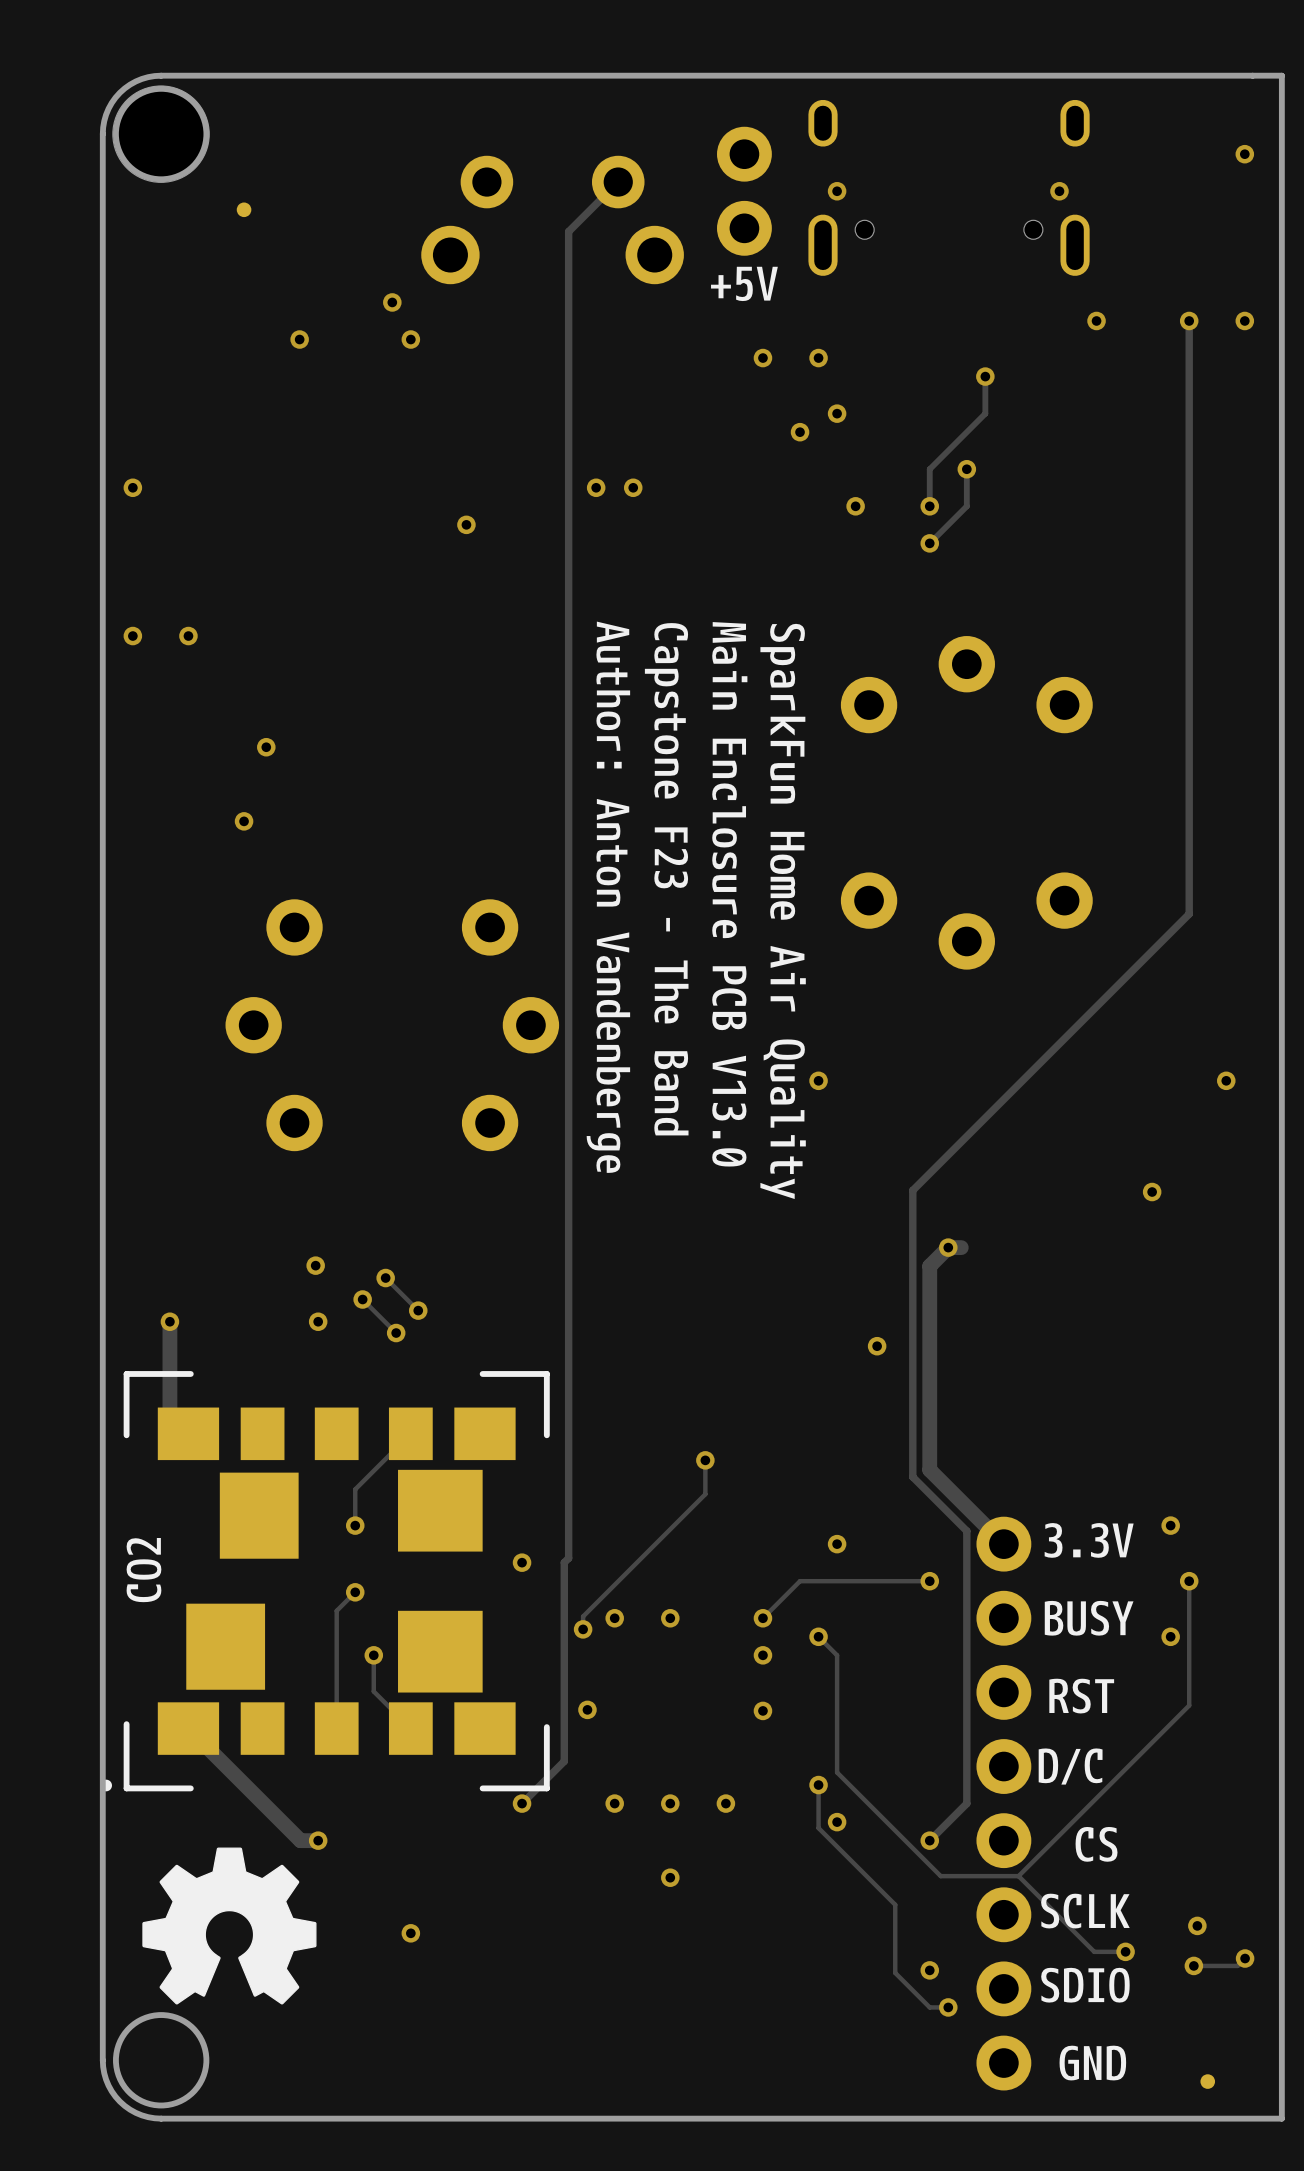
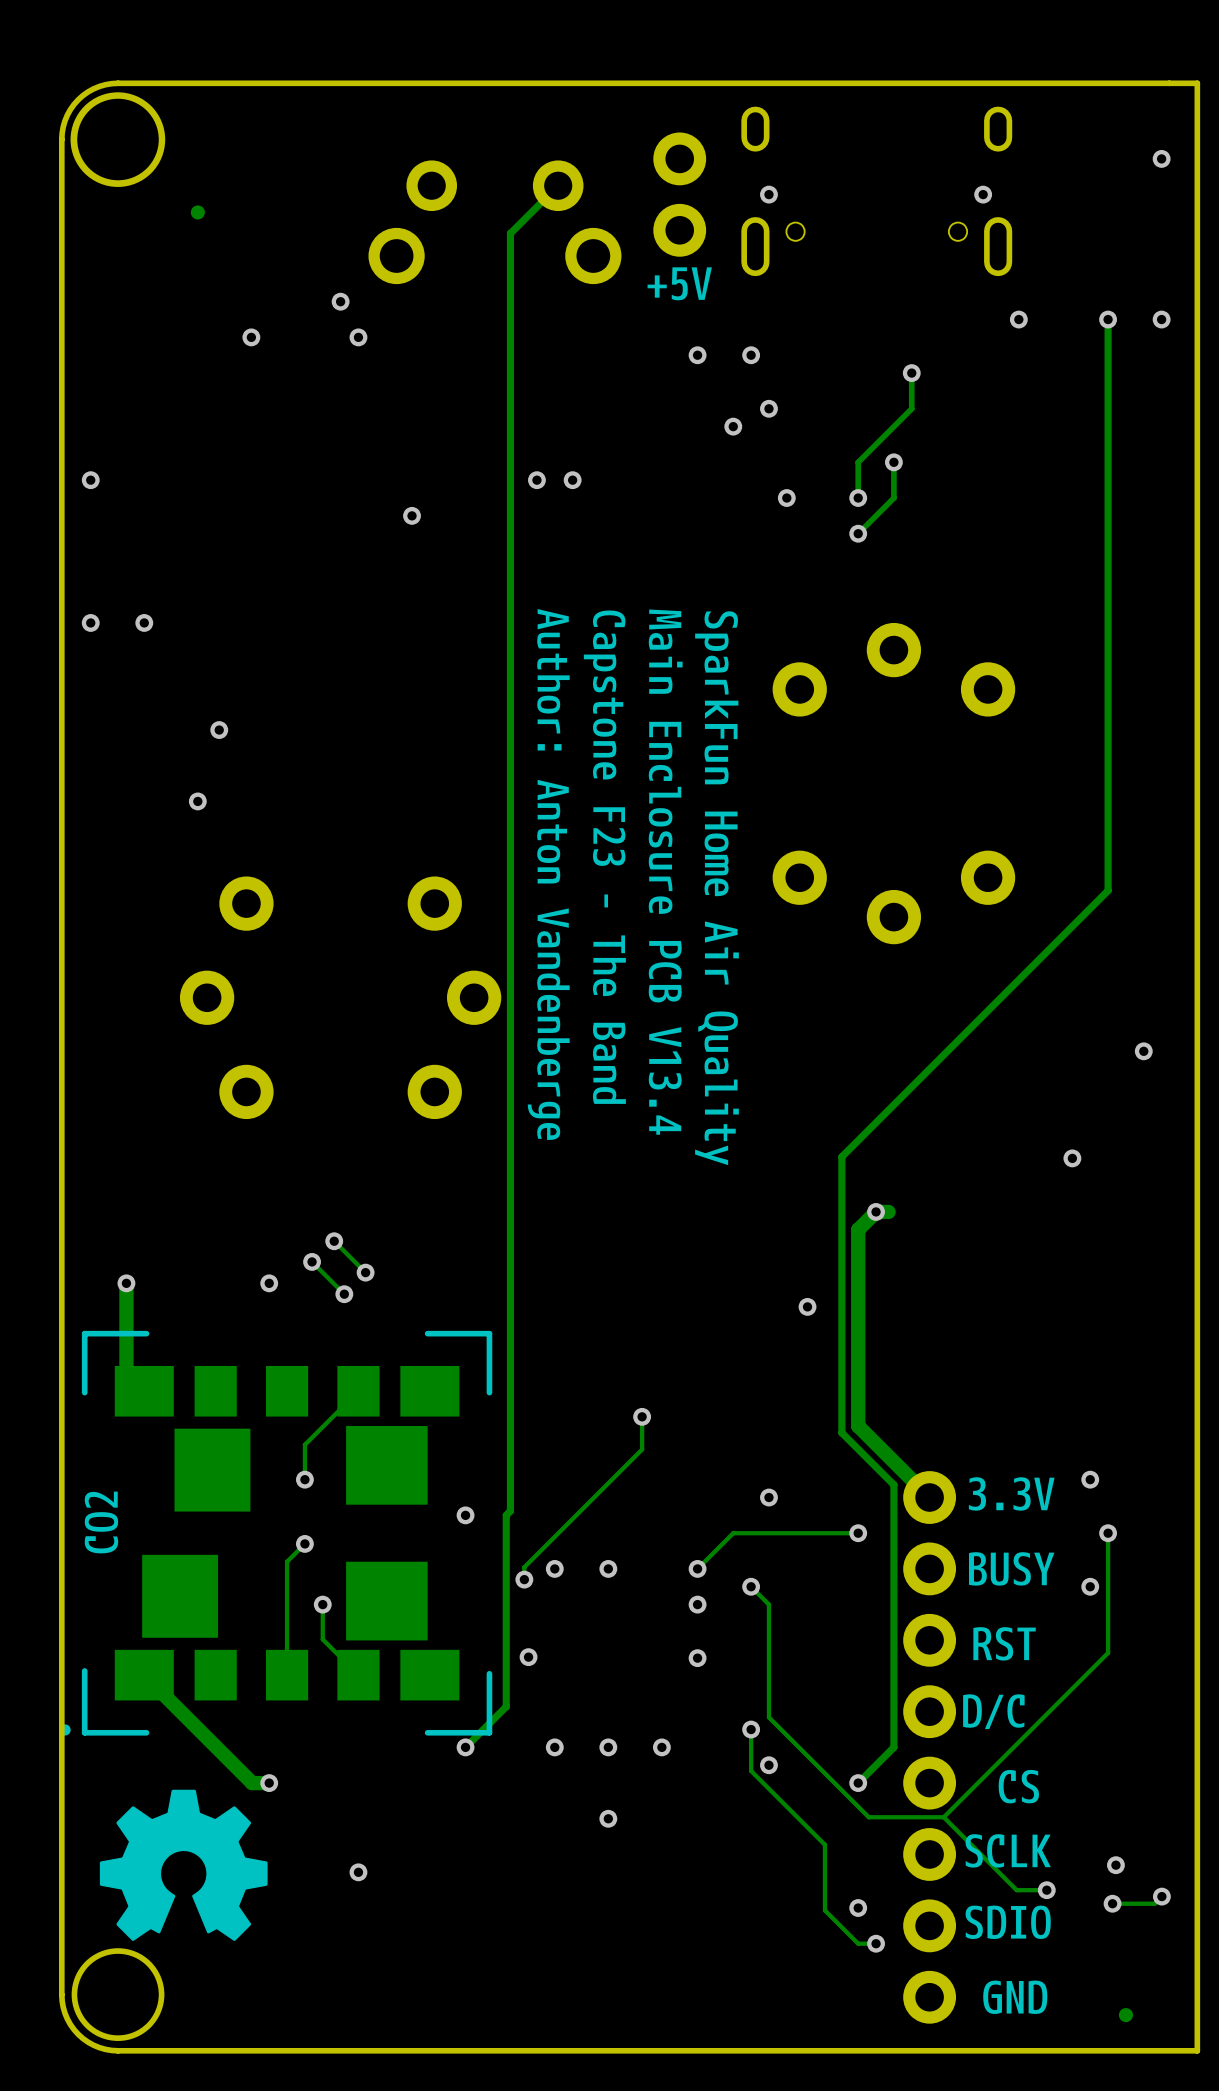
drawing shape: [586, 621, 806, 1200] -> [527, 609, 739, 1166]
via: (818, 1080) -> none
via: (315, 1265) -> none

